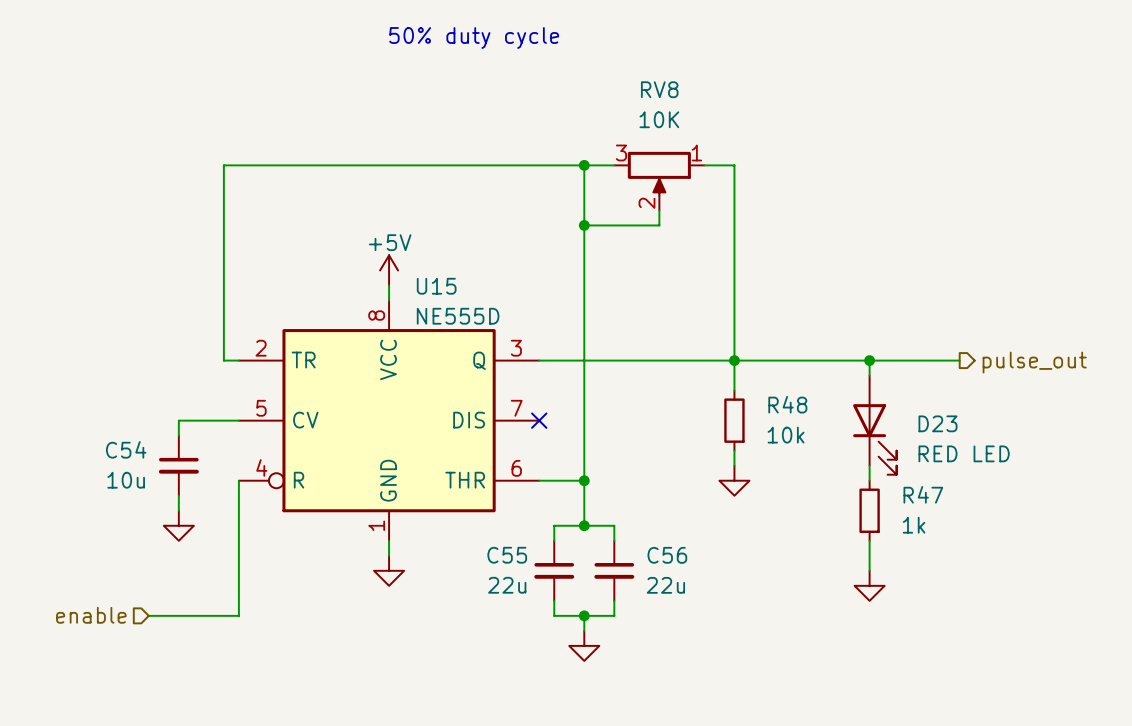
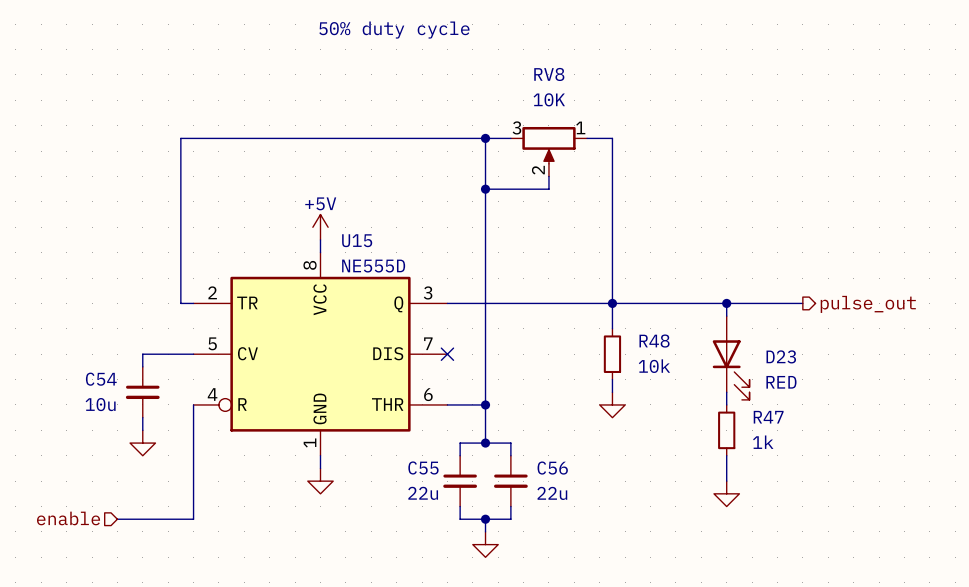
D23 value: RED LED (964, 453) -> RED (781, 382)

